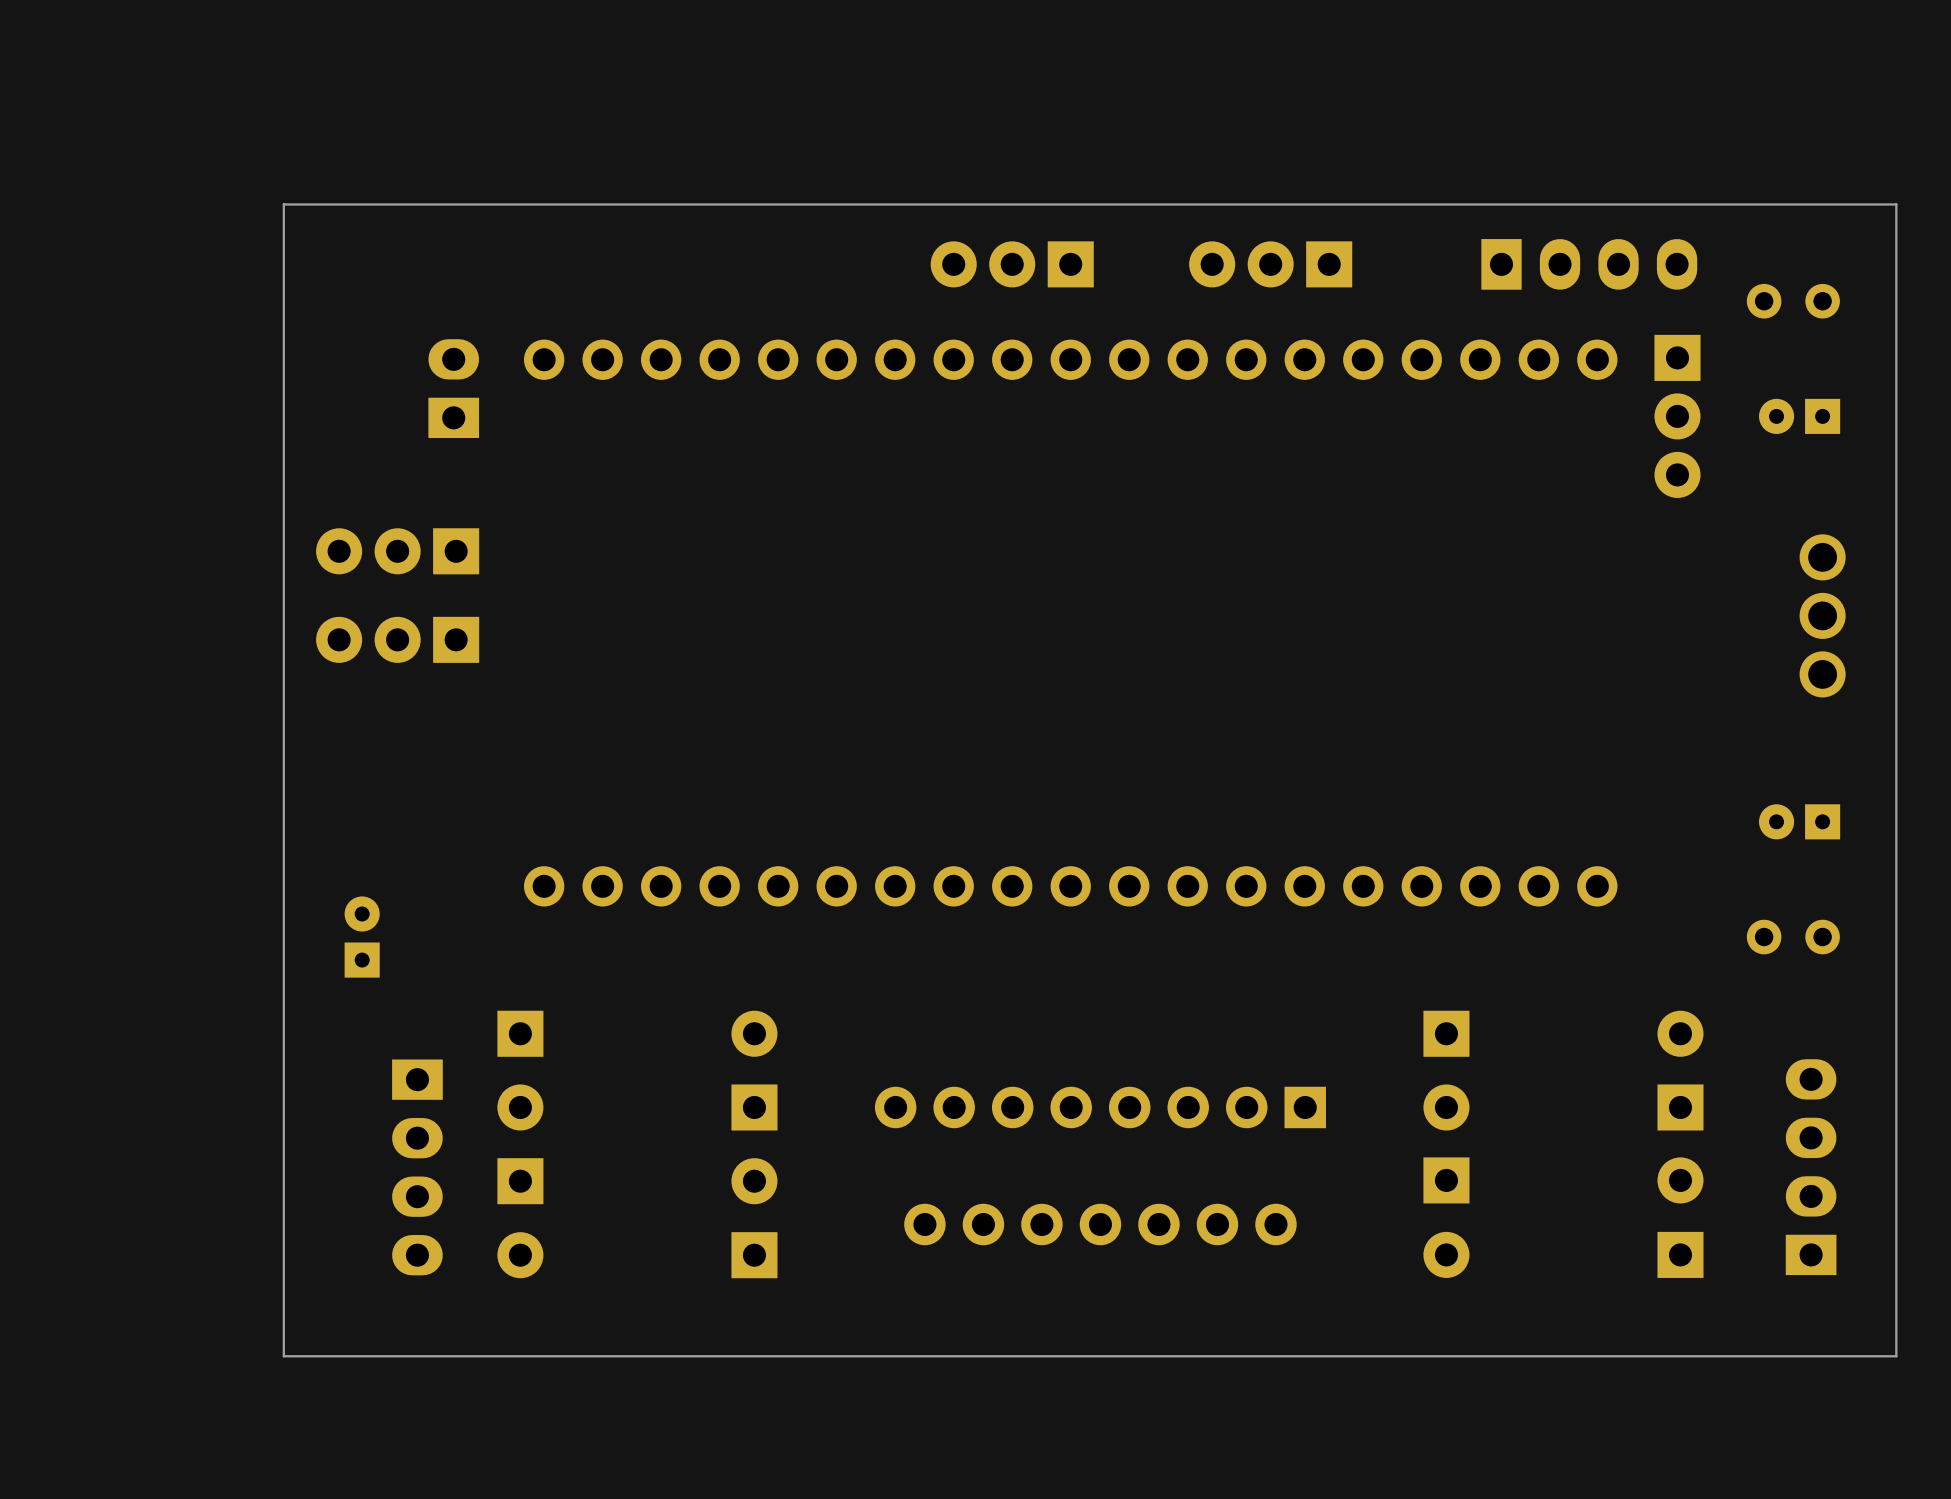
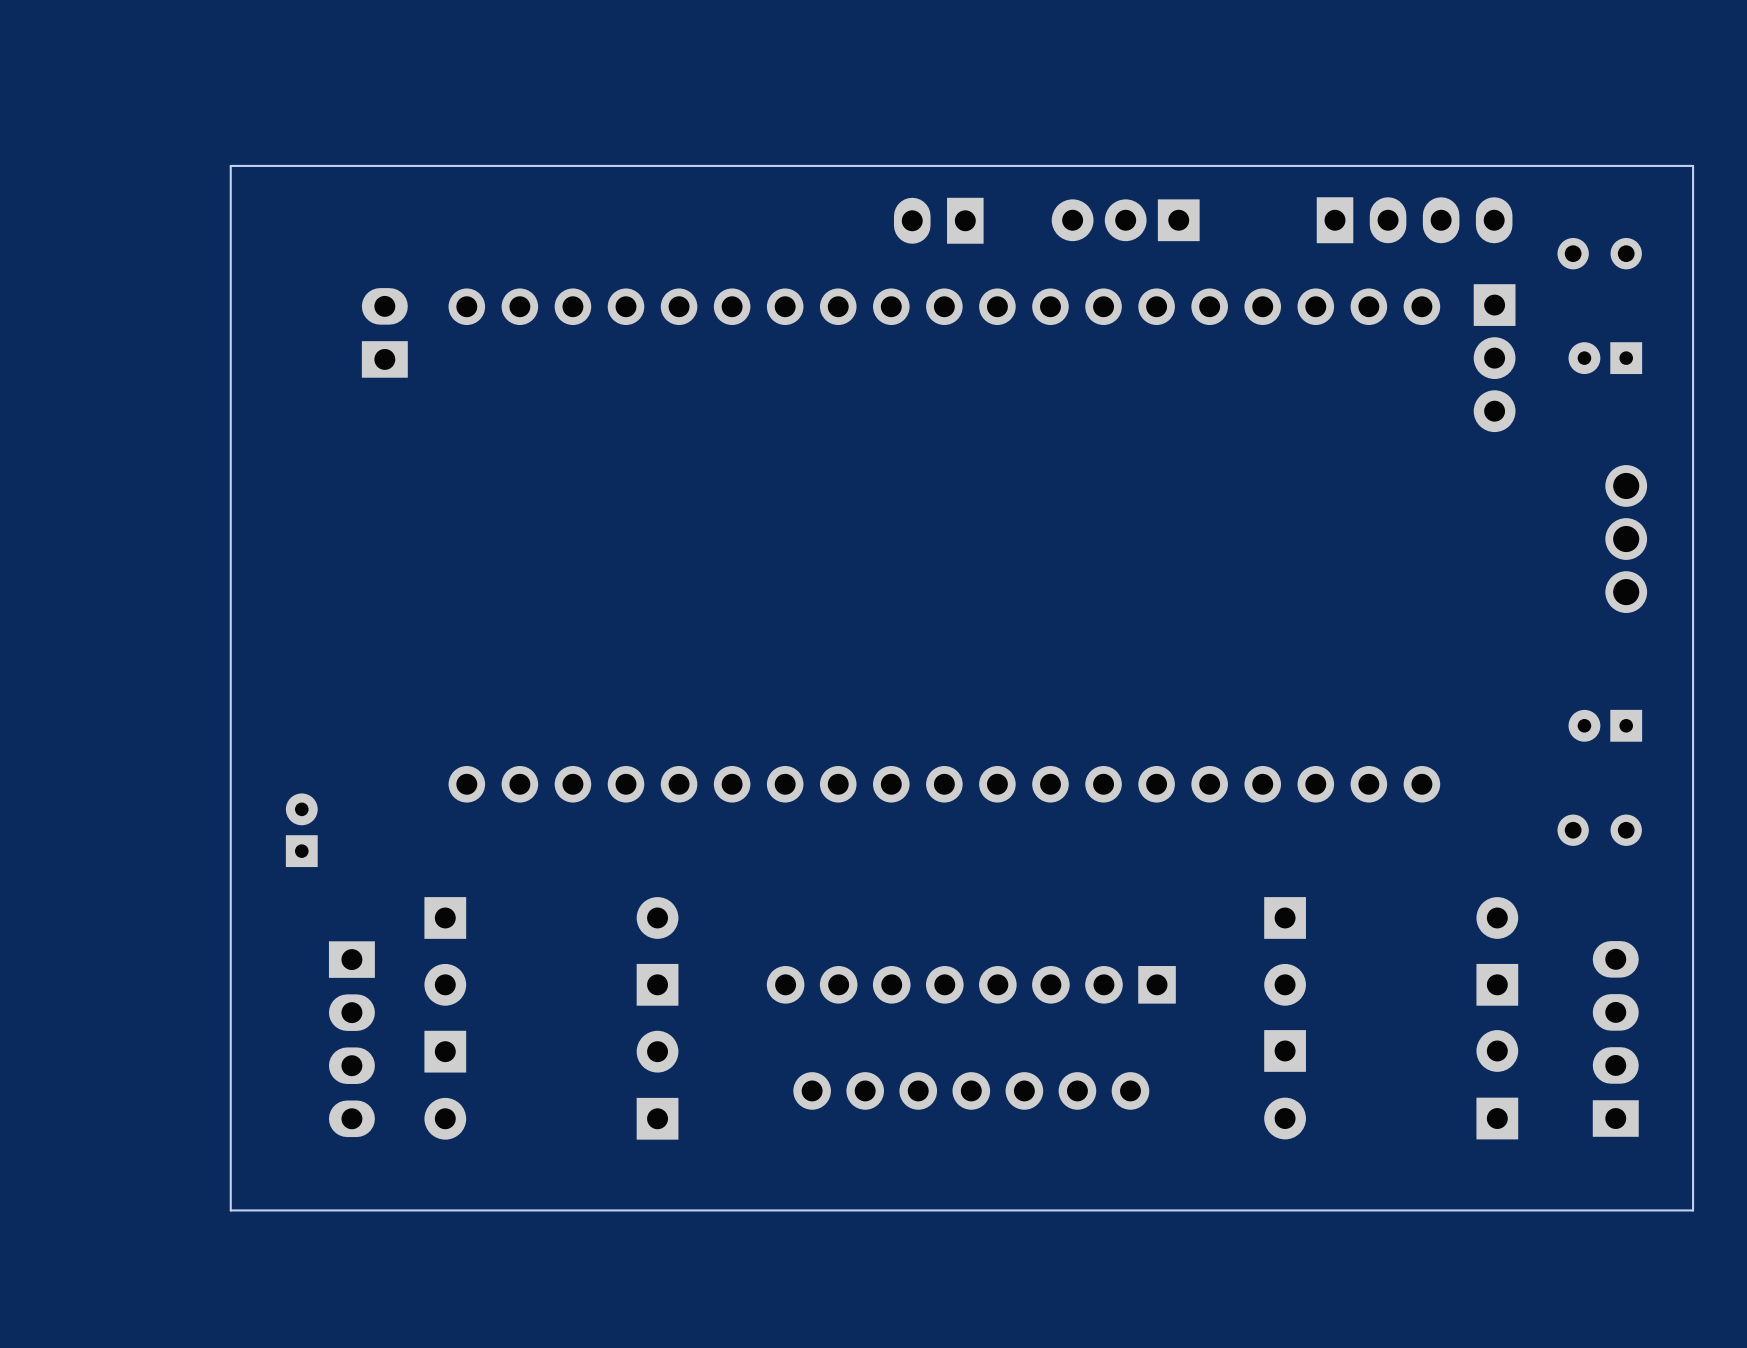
part: (1012, 264) -> none
part: none -> (938, 220)
part: (397, 551) -> none
part: (397, 639) -> none

